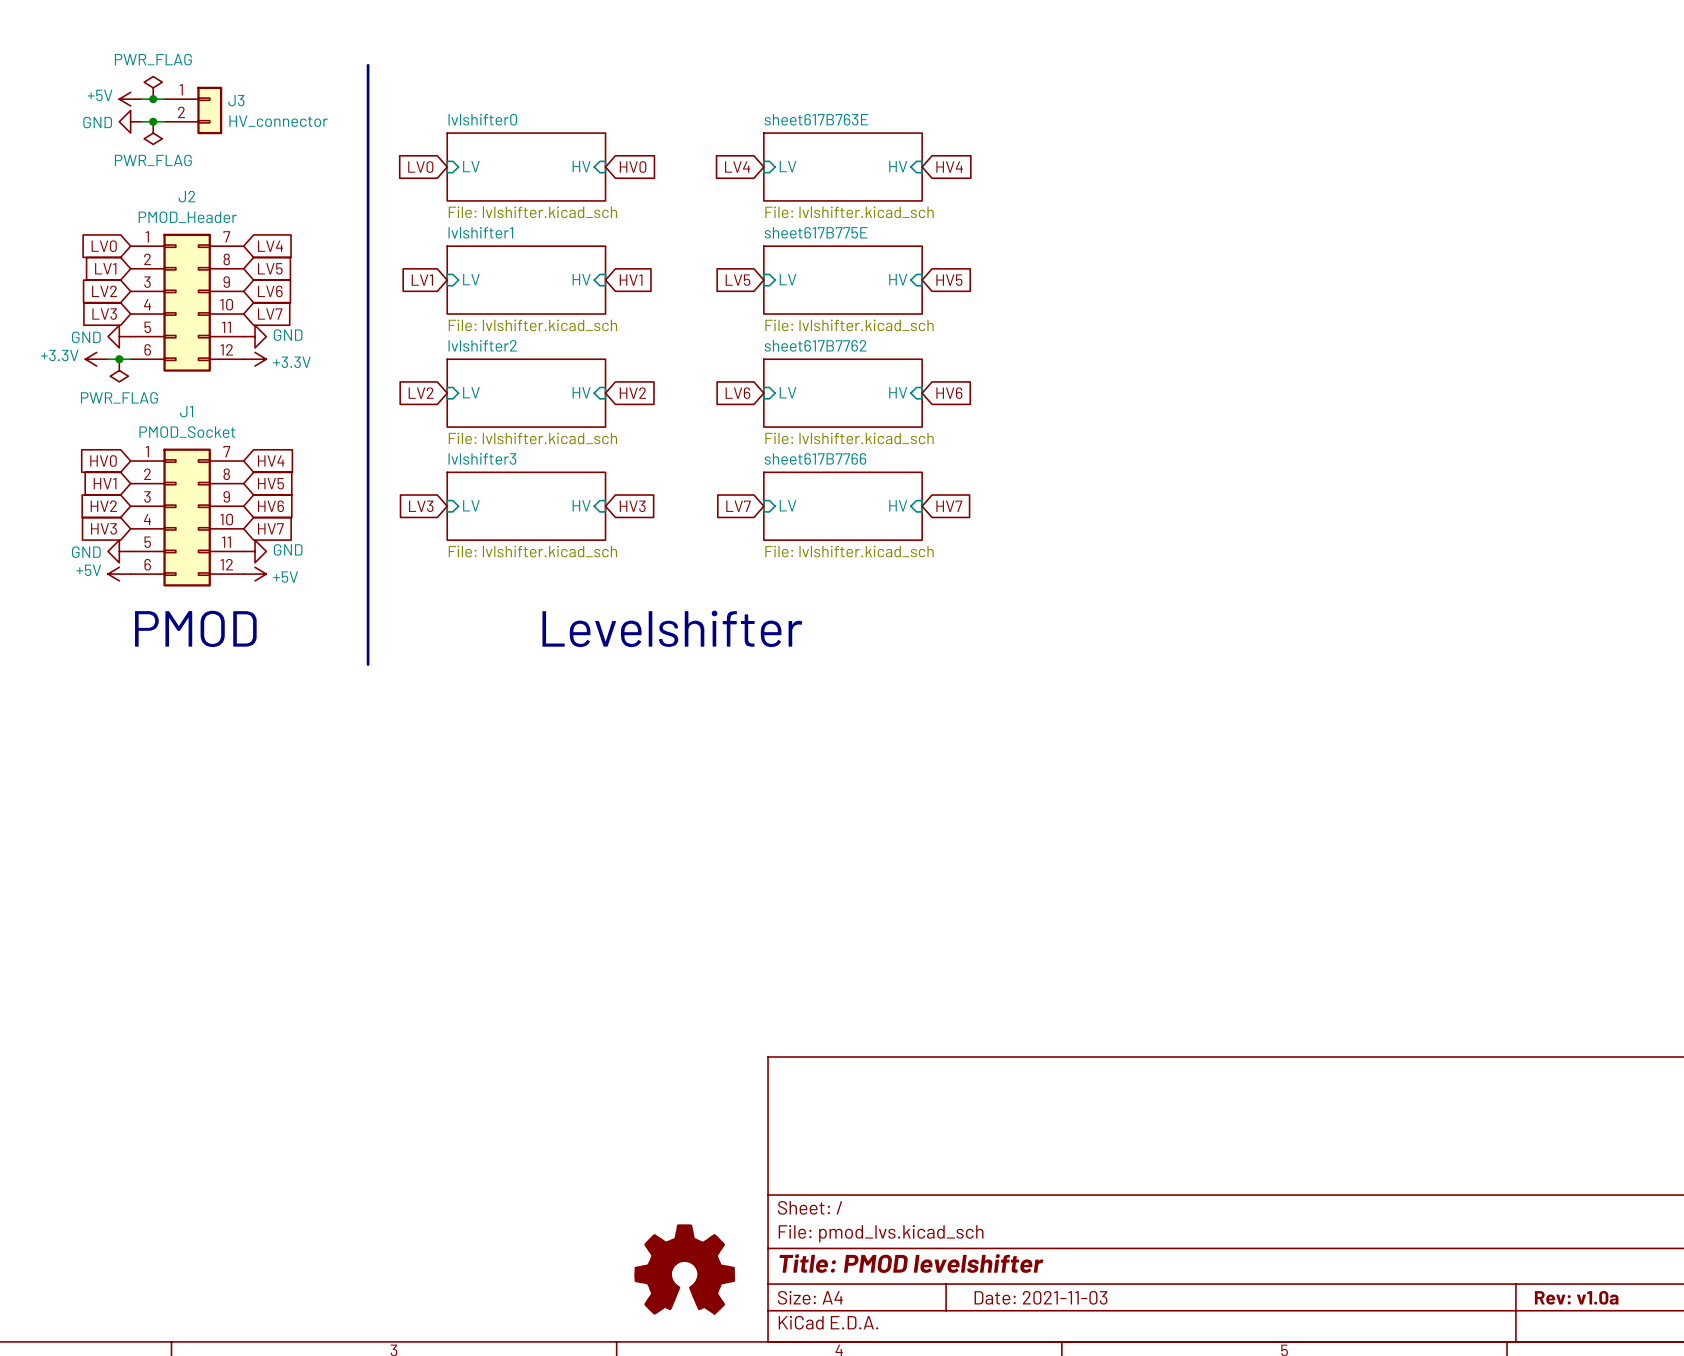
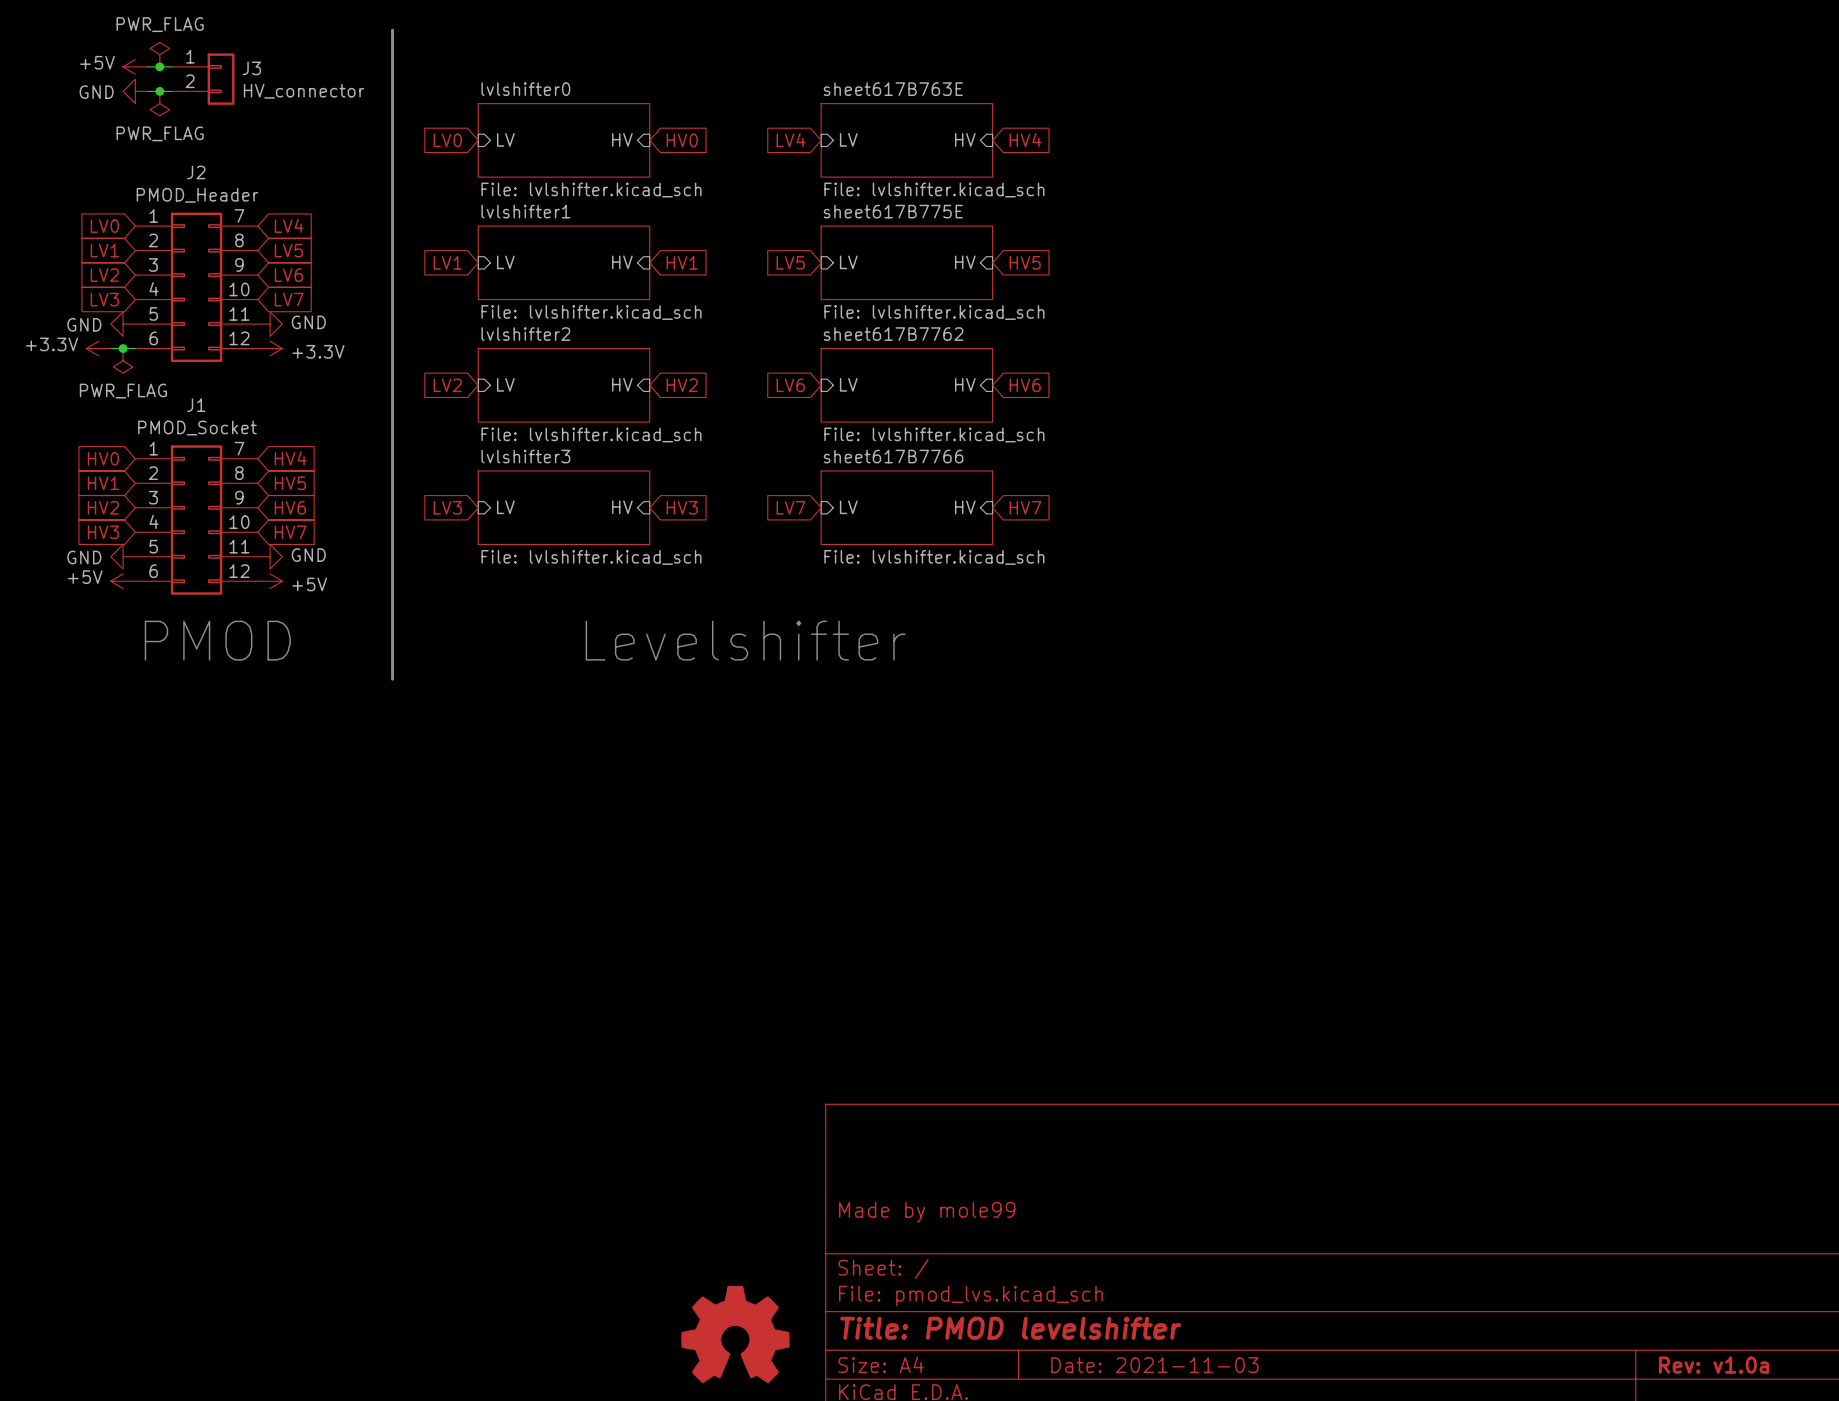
title block: none -> Made by mole99 (927, 1212)

